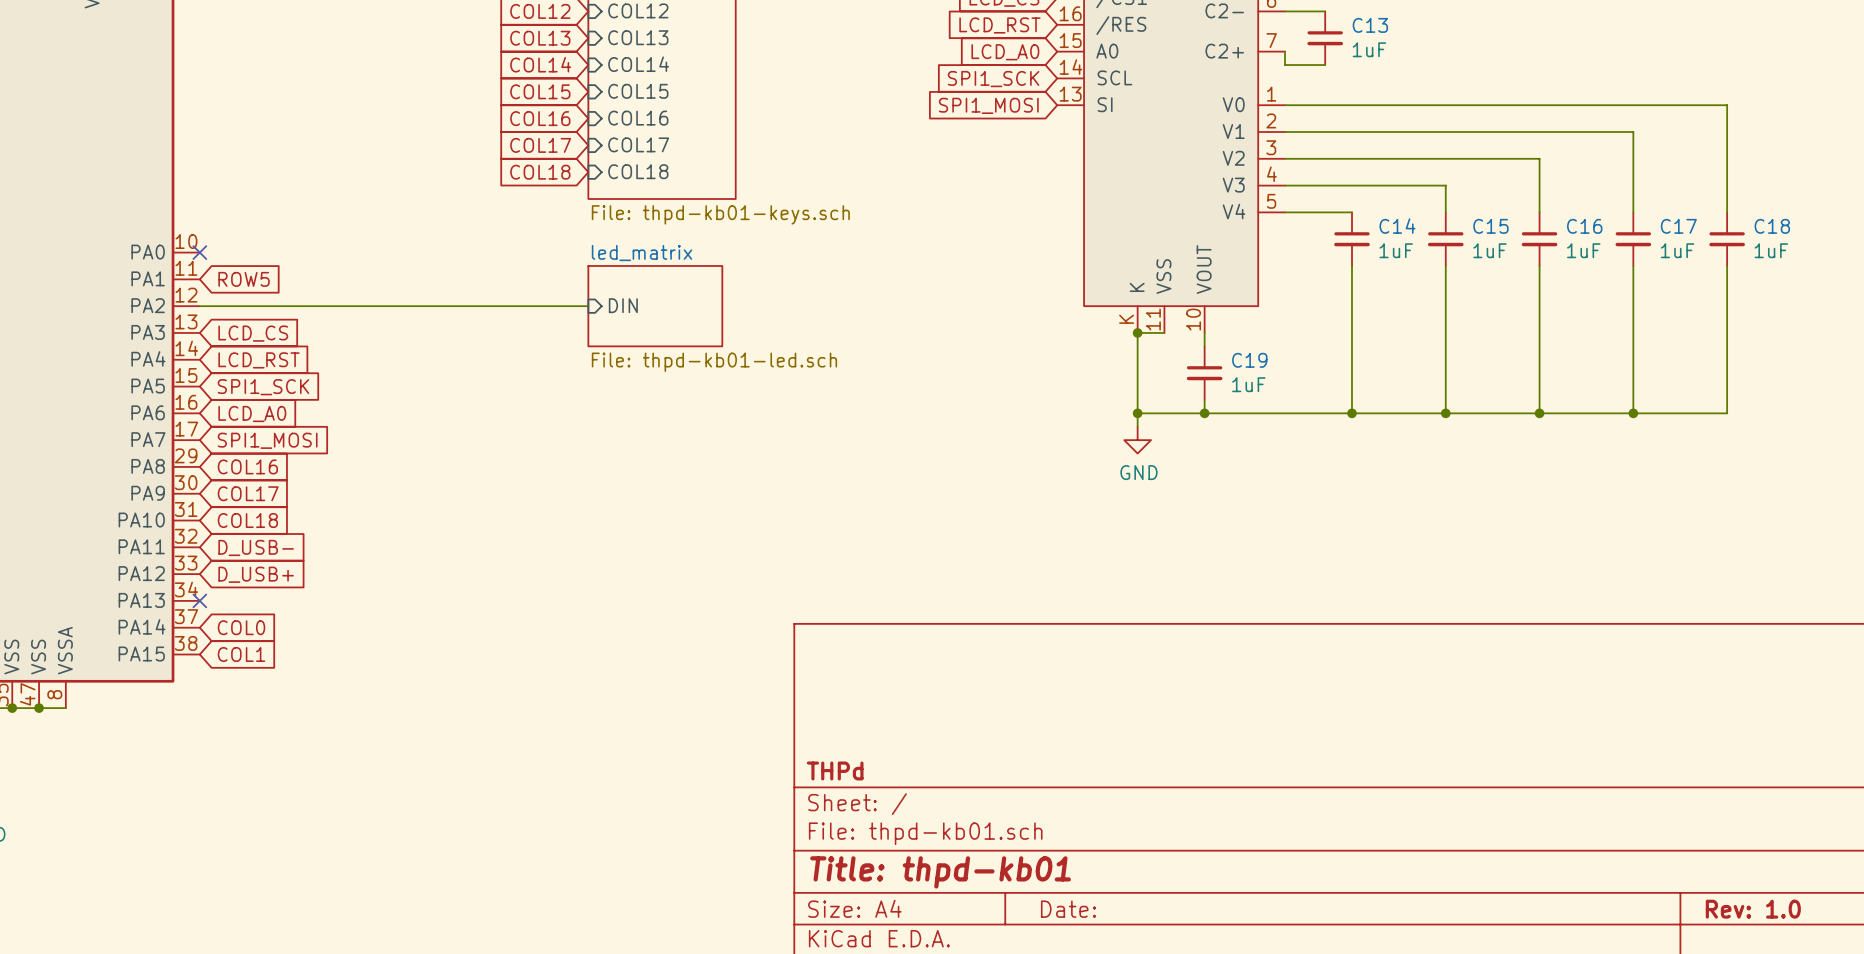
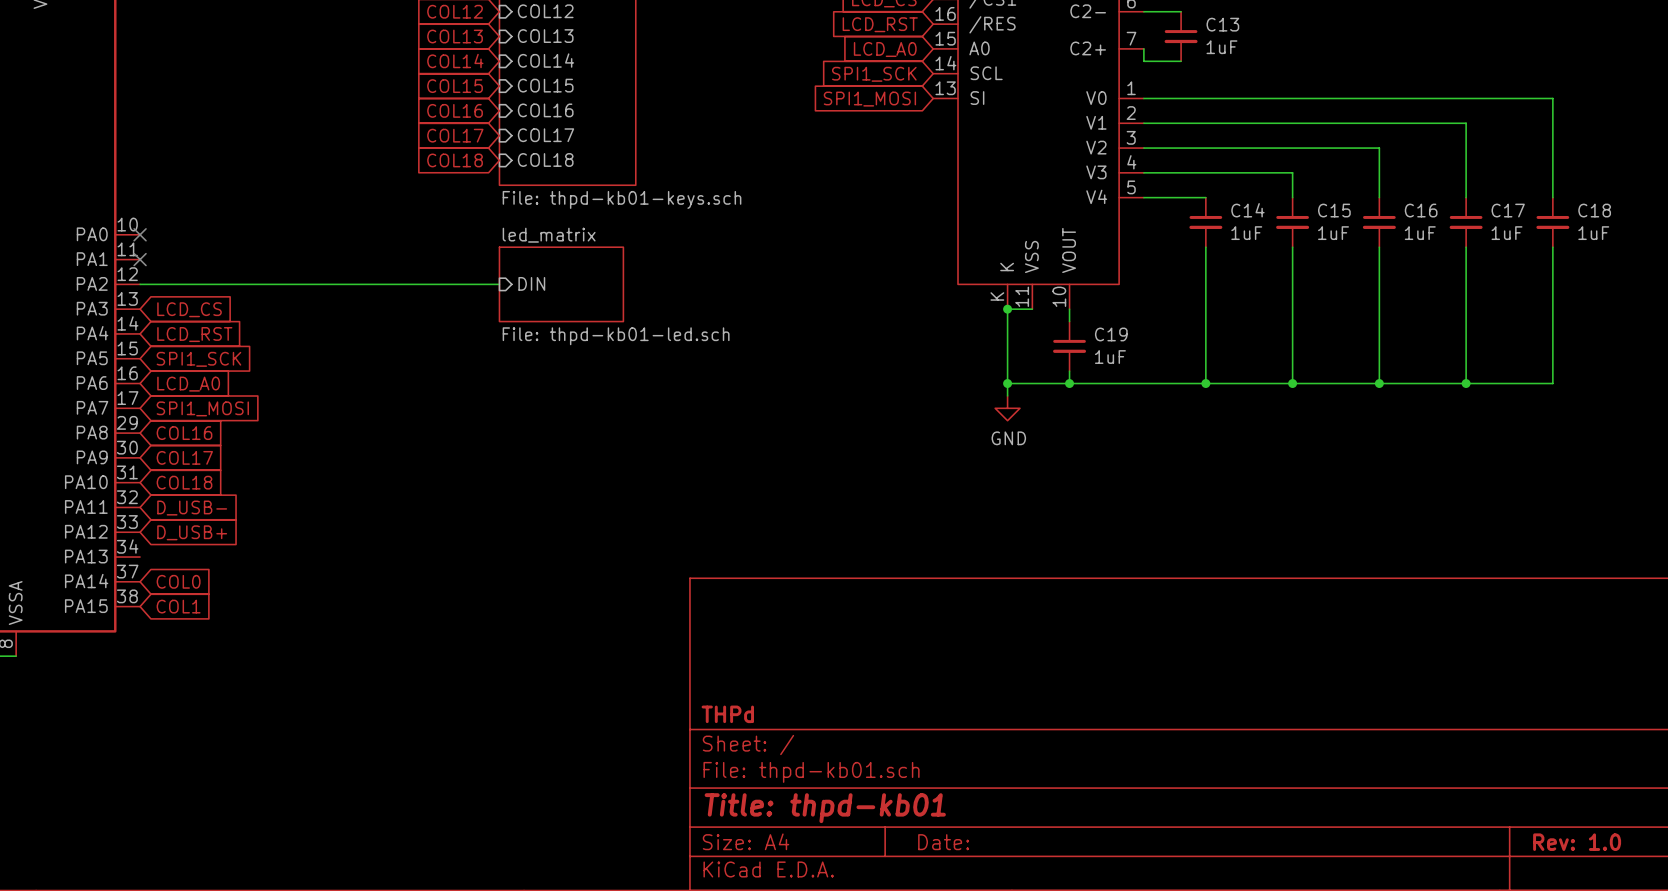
no-connect mark: none -> (140, 259)
global label: ROW5 (244, 279) -> none
no-connect mark: (199, 600) -> none

